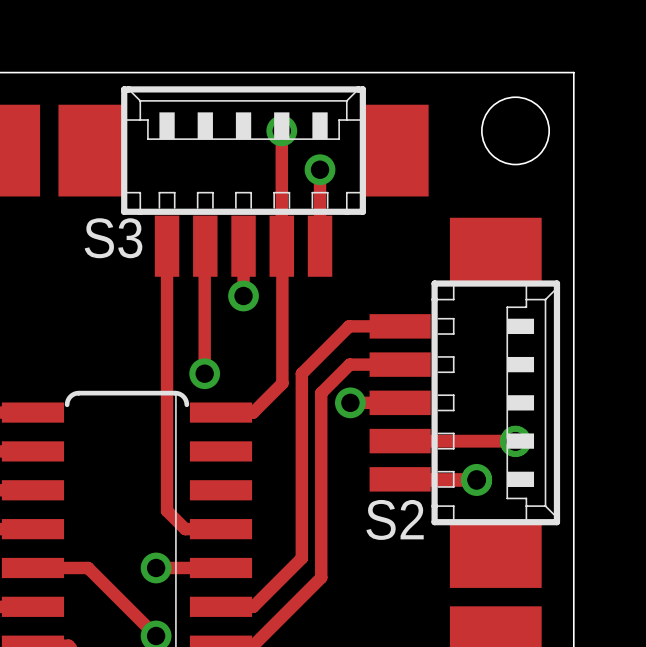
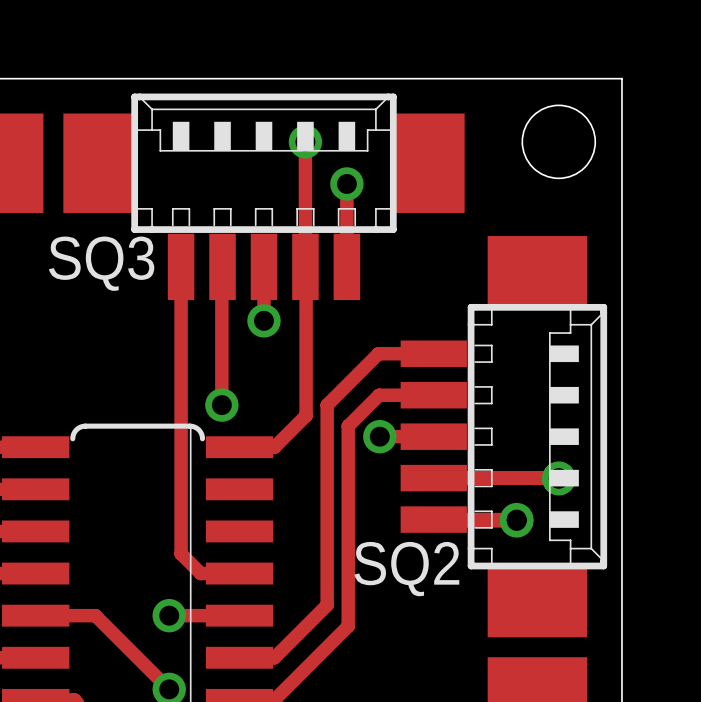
S3 name: S3 (113, 238) -> SQ3 (101, 263)
S2 name: S2 (395, 519) -> SQ2 (406, 569)

